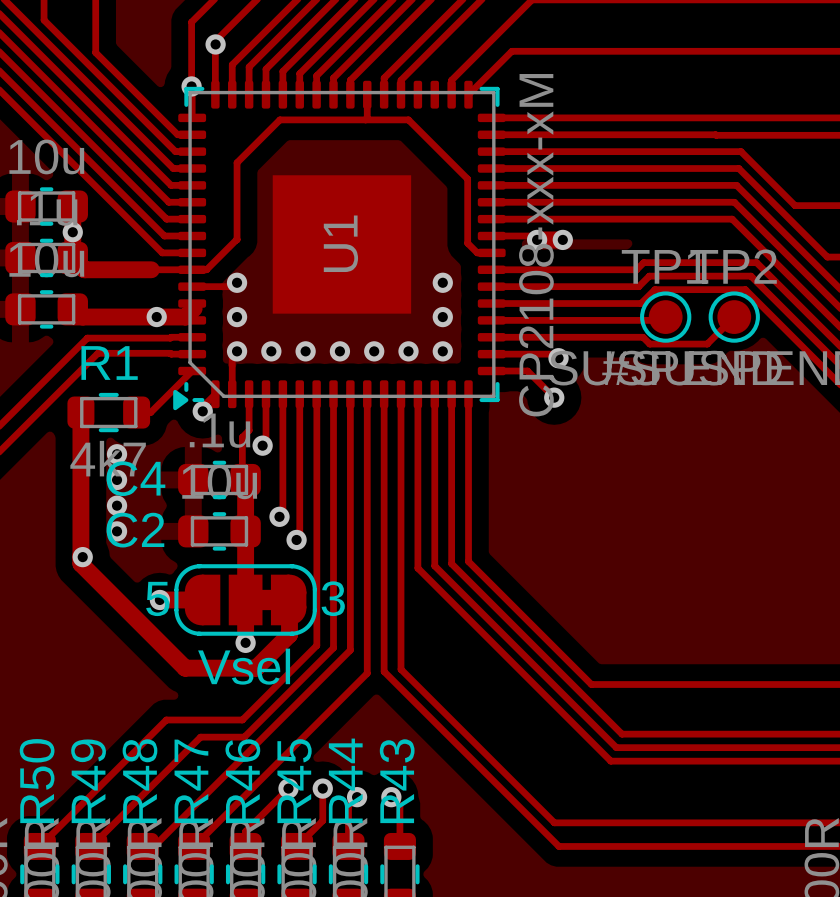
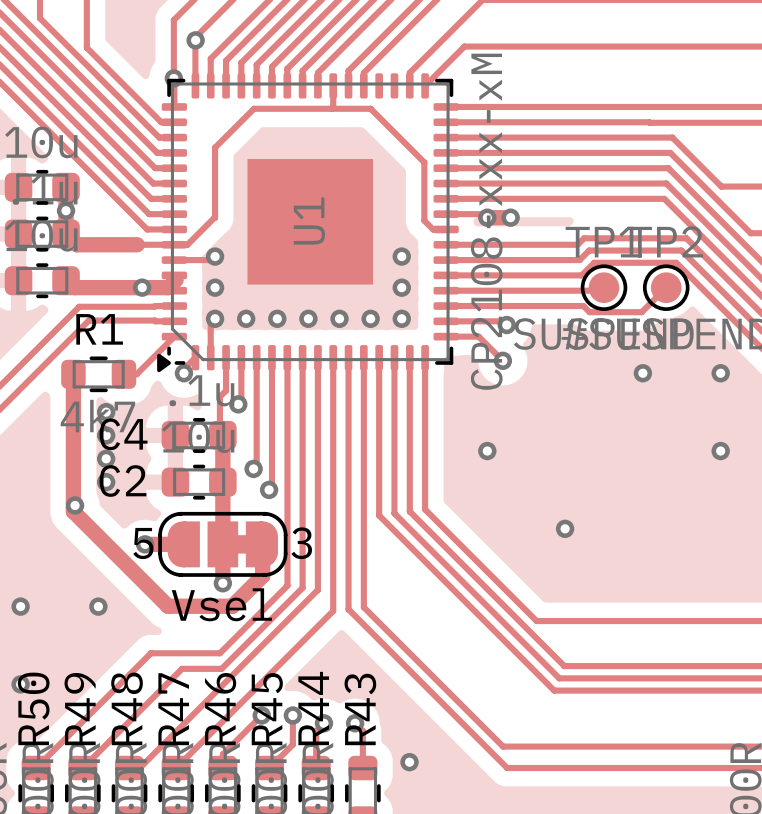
via: none -> (642, 373)
via: none -> (720, 373)
via: none -> (487, 451)
via: none -> (720, 451)
via: none -> (565, 528)
via: none -> (20, 606)
via: none -> (98, 606)
via: none -> (20, 684)
via: none -> (409, 762)

